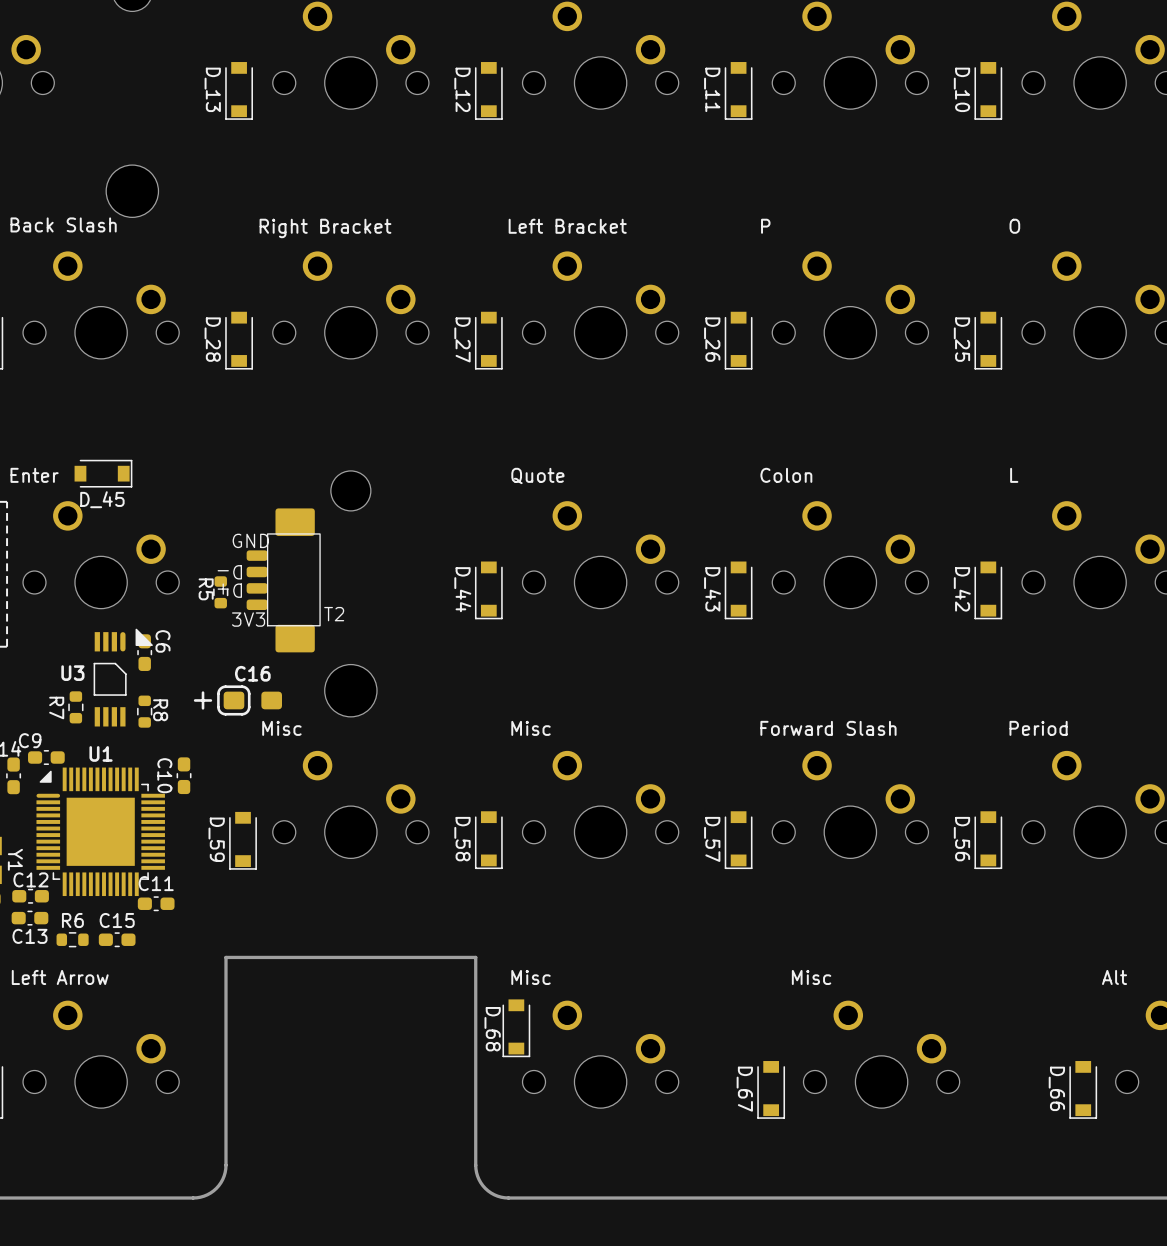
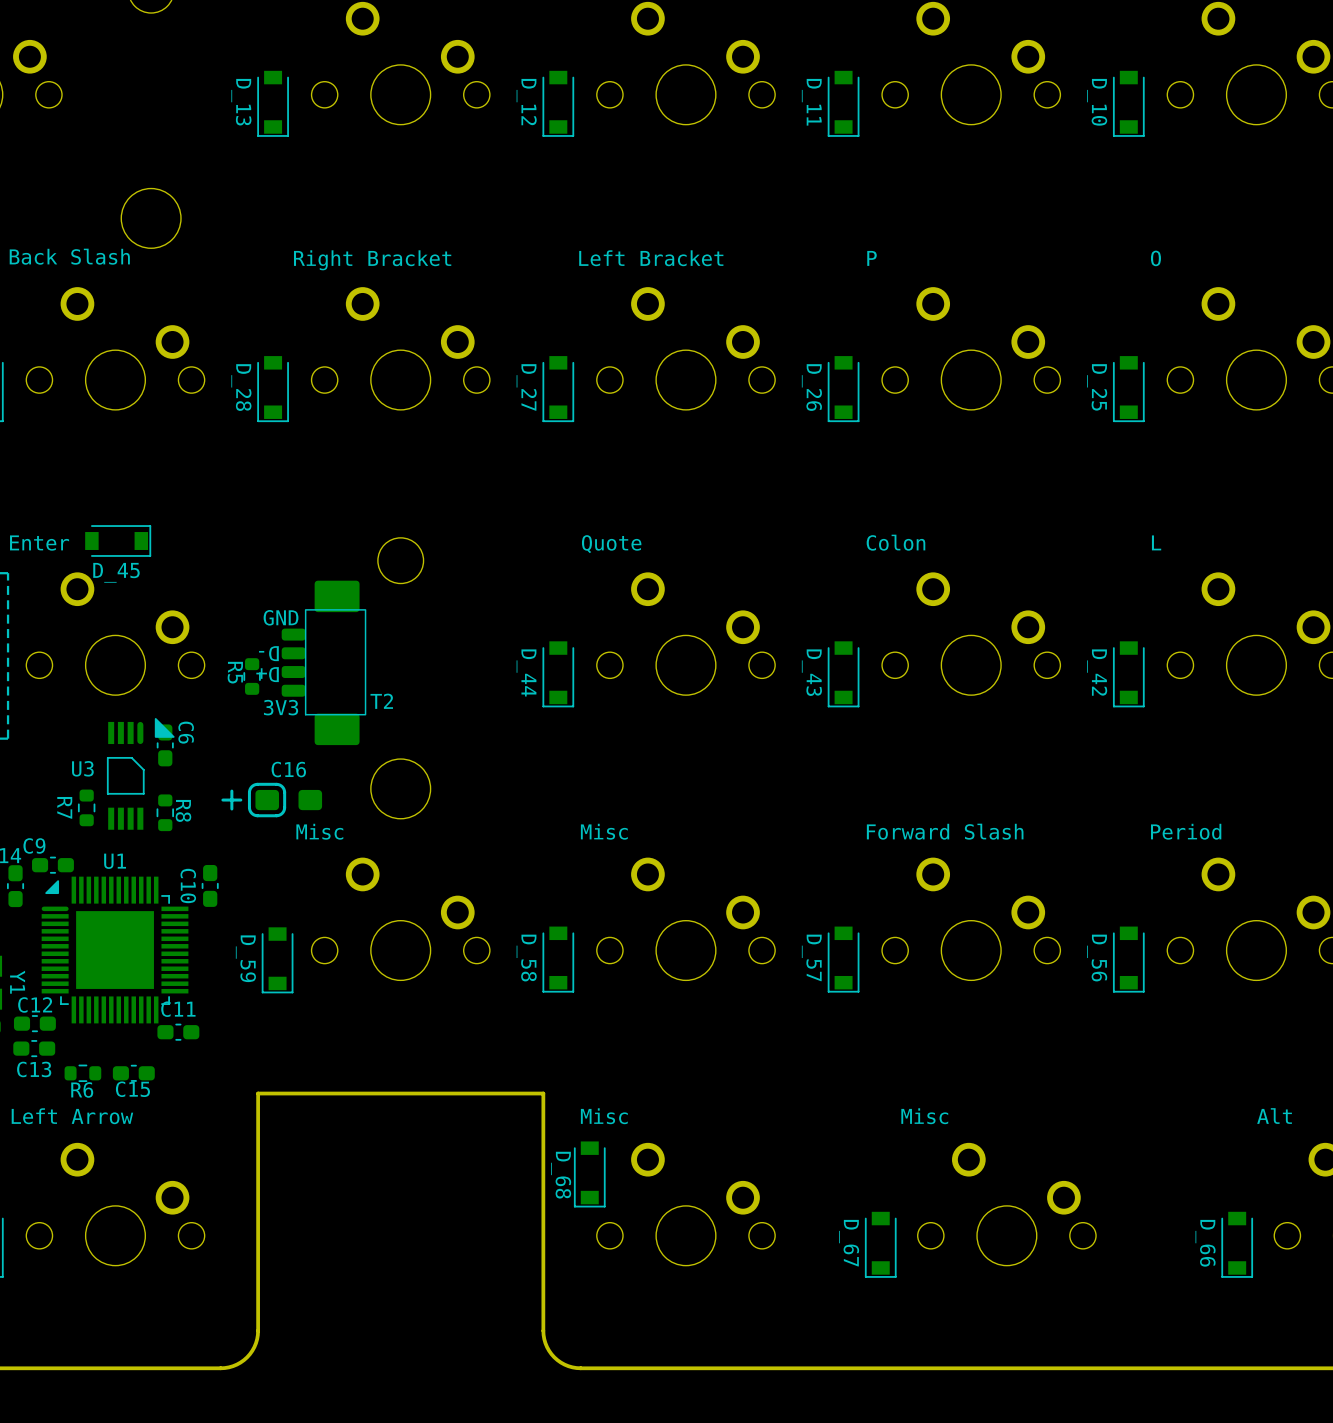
R6 name position: R6 (72, 920) -> R6 (82, 1089)
C15 name position: C15 (117, 920) -> C15 (132, 1089)

